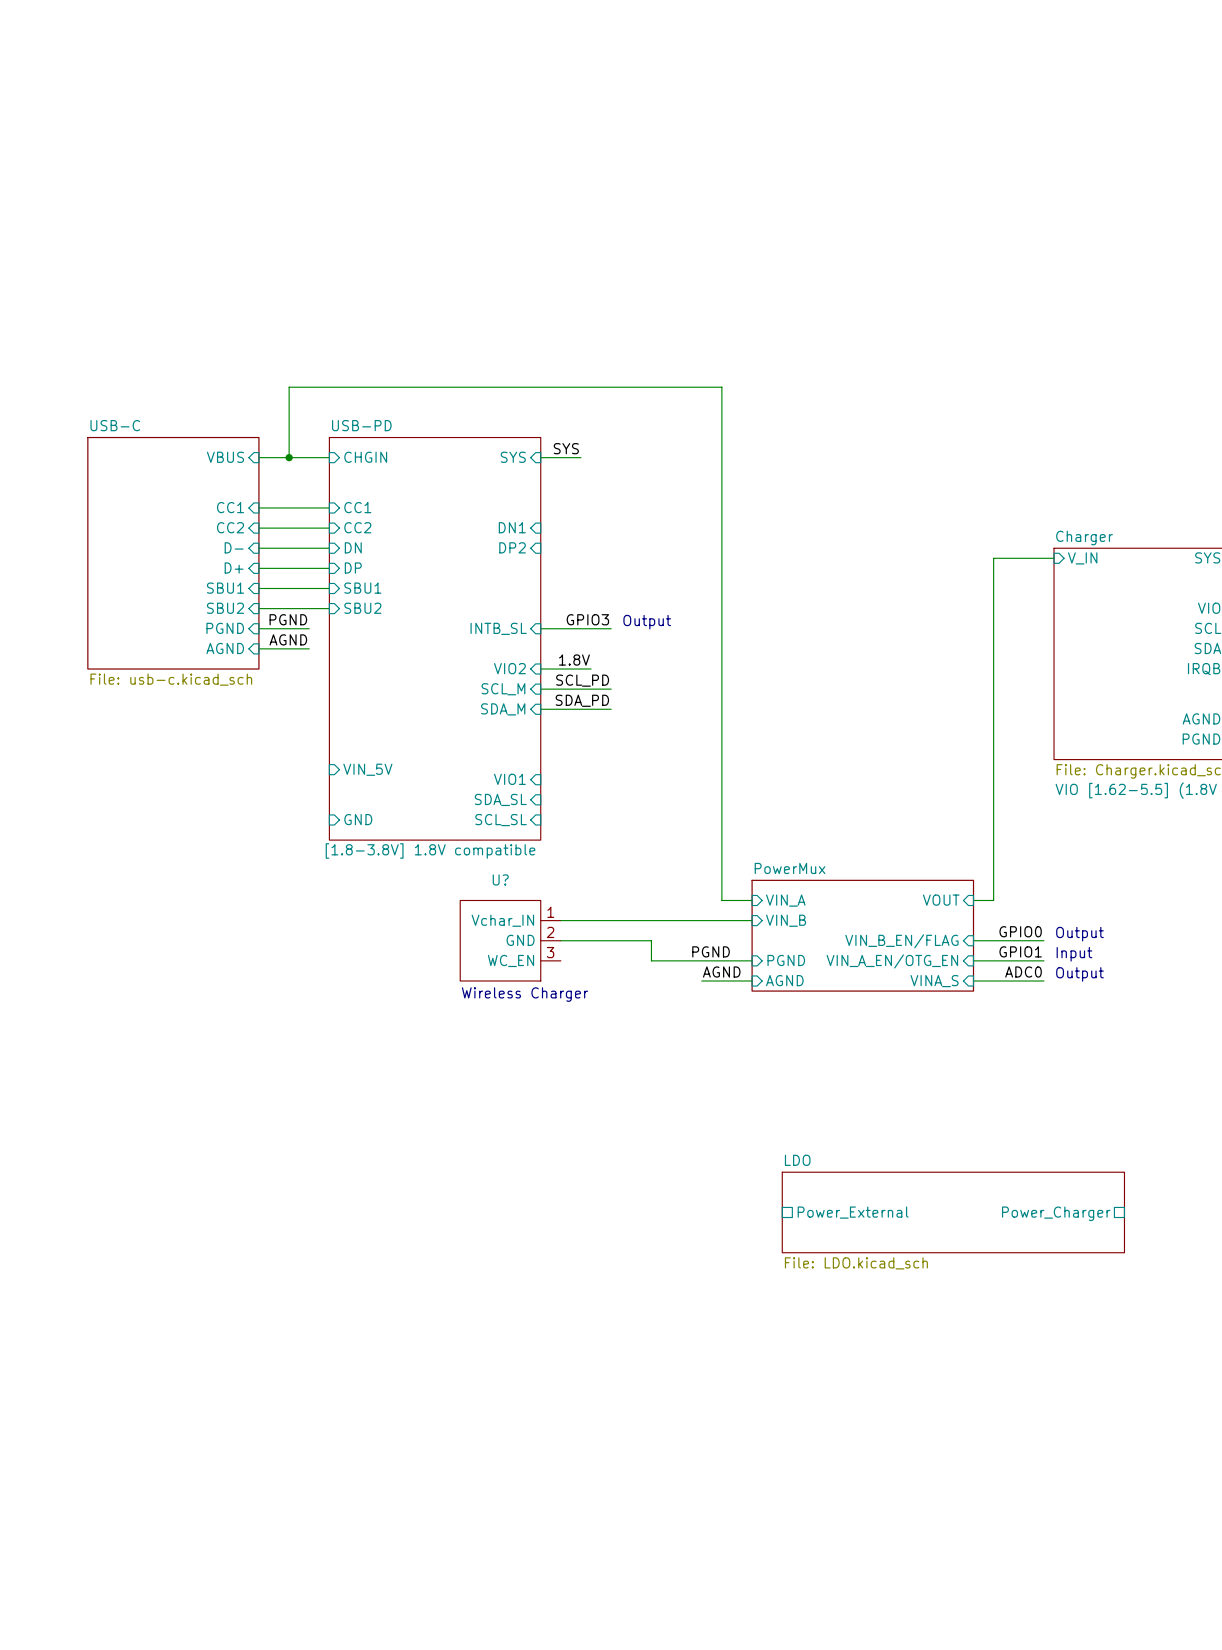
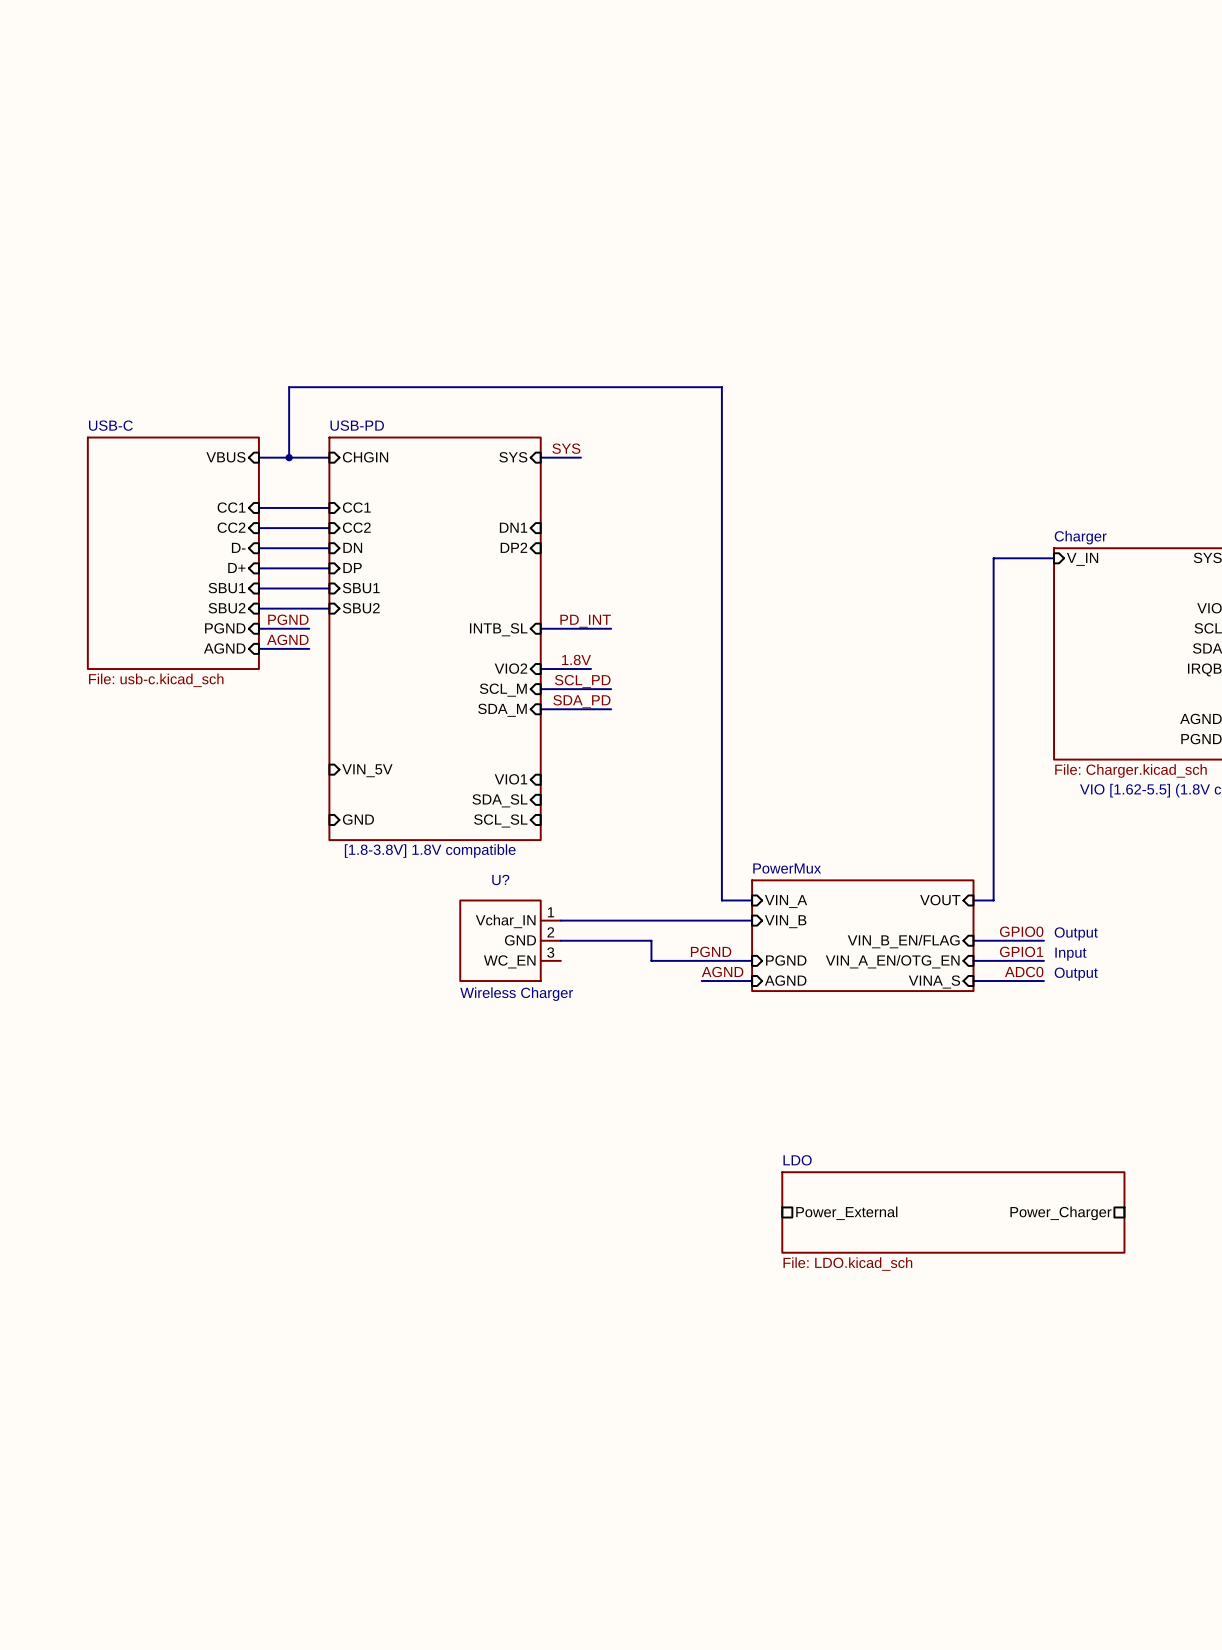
label: GPIO3 (587, 619) -> PD_INT (585, 621)
text: Output (647, 622) -> none

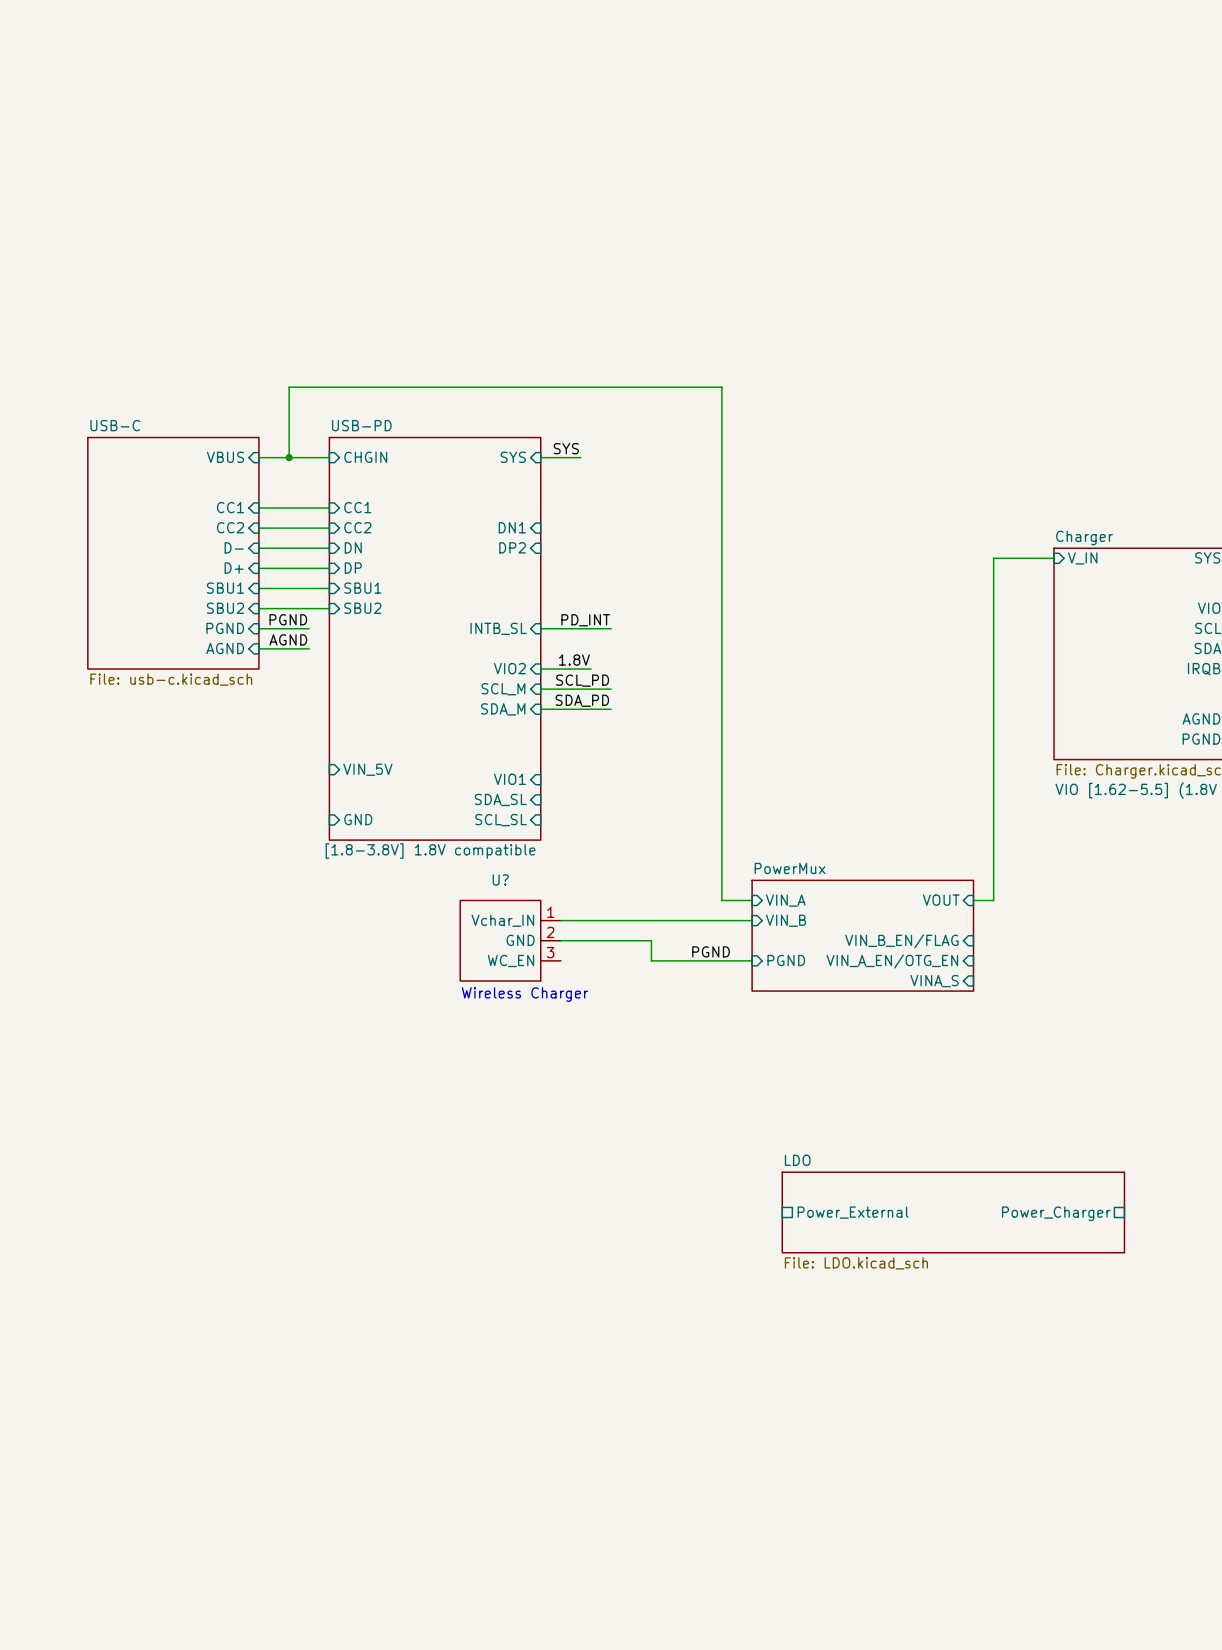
label: GPIO0 (1021, 931) -> none
text: Output (1076, 933) -> none
wire: (973, 940) (1043, 940) -> none
label: GPIO1 (1021, 951) -> none
text: Input (1070, 954) -> none
wire: (973, 960) (1043, 960) -> none
label: AGND (722, 972) -> none
label: ADC0 (1024, 972) -> none
text: Output (1076, 974) -> none
sheet pin: AGND (785, 980) -> none
wire: (701, 981) (752, 981) -> none
wire: (973, 981) (1043, 981) -> none

